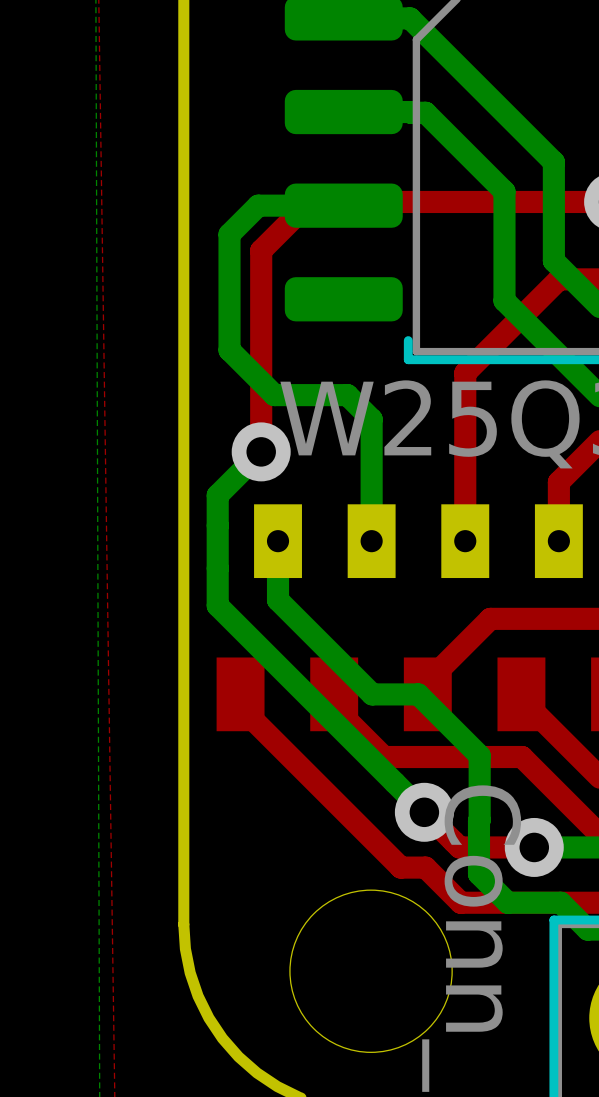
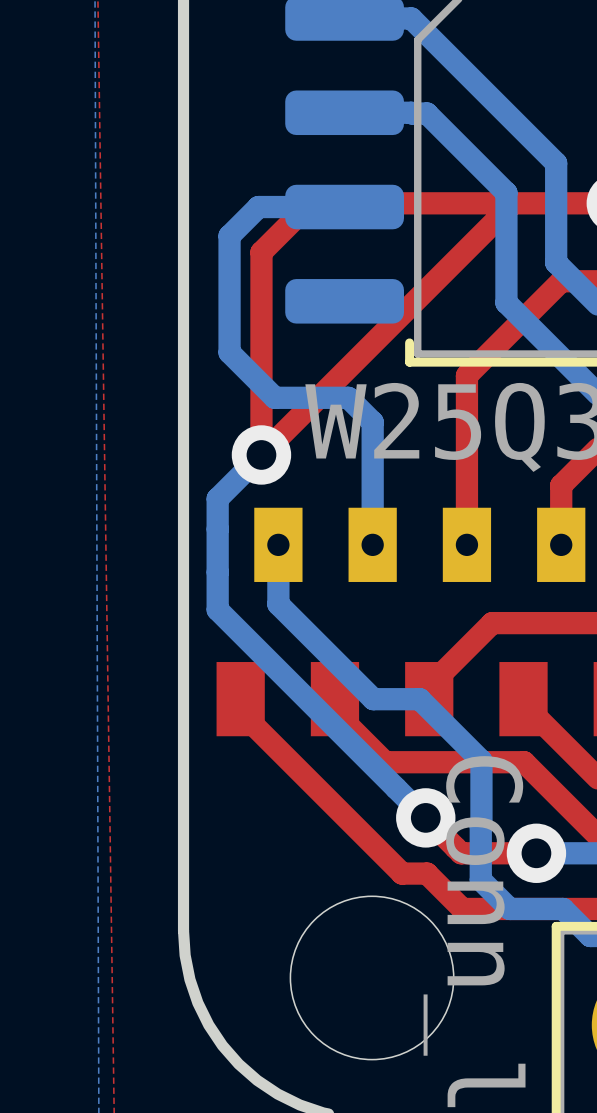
top track: none -> (510, 206) (261, 454)

